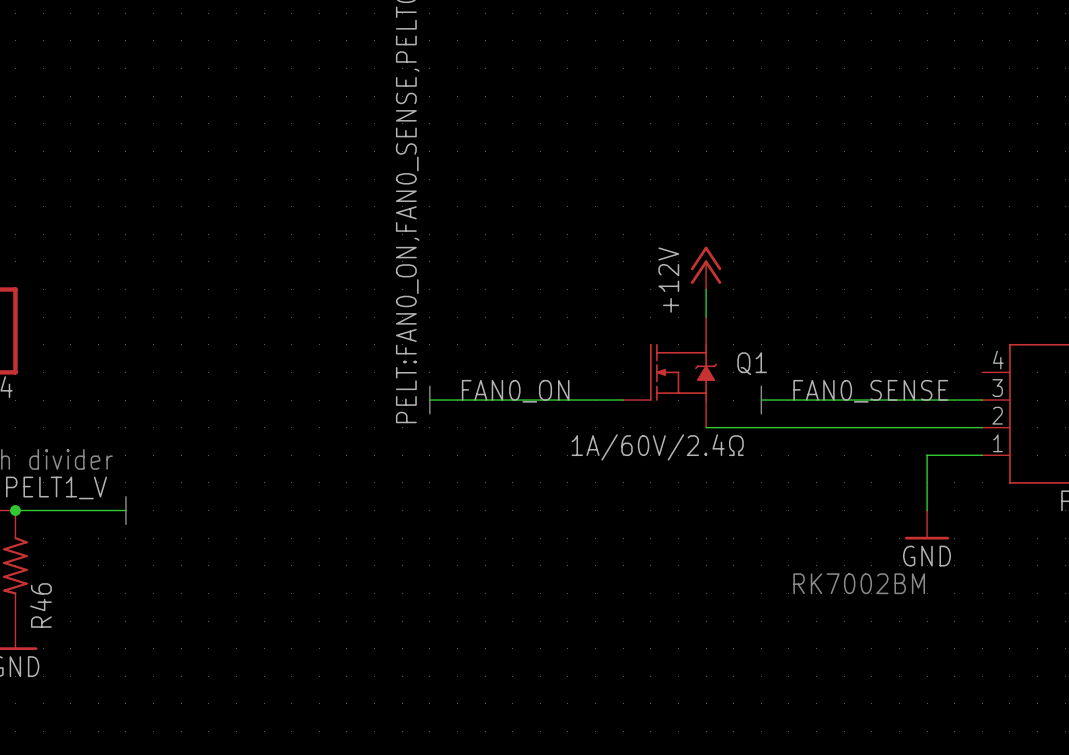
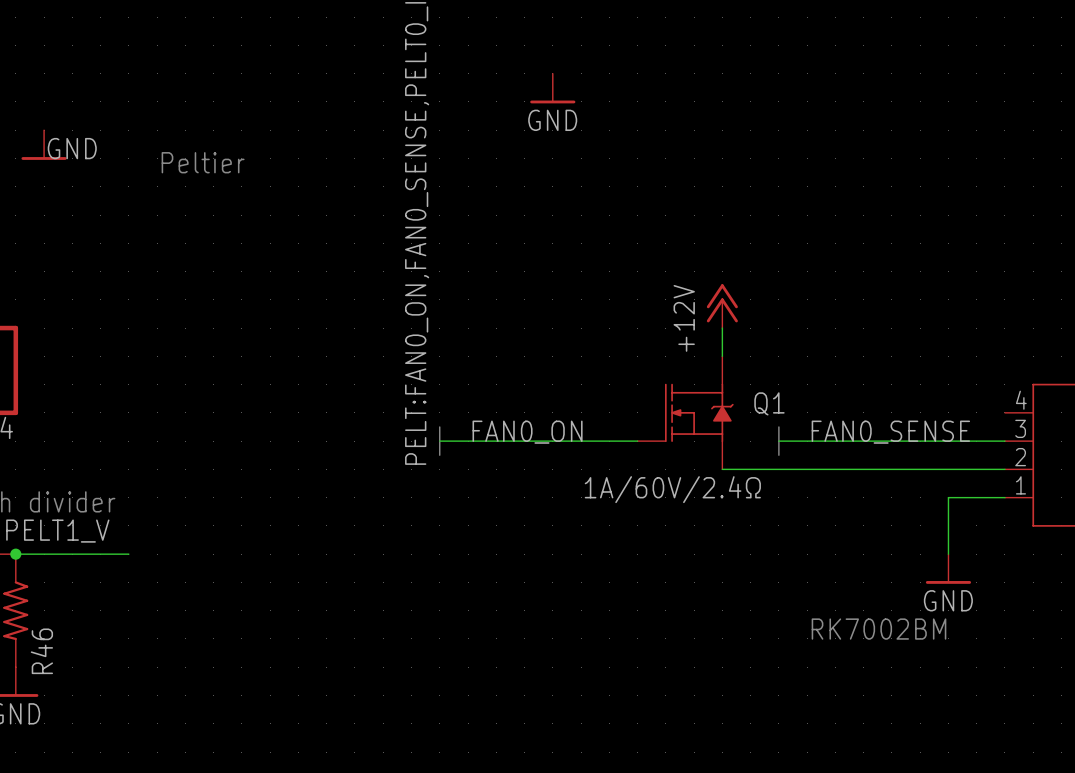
power symbol: none -> GND (552, 88)
power symbol: none -> GND (44, 145)
text: none -> Peltier (203, 162)
bus: (125, 496) (125, 524) -> none

